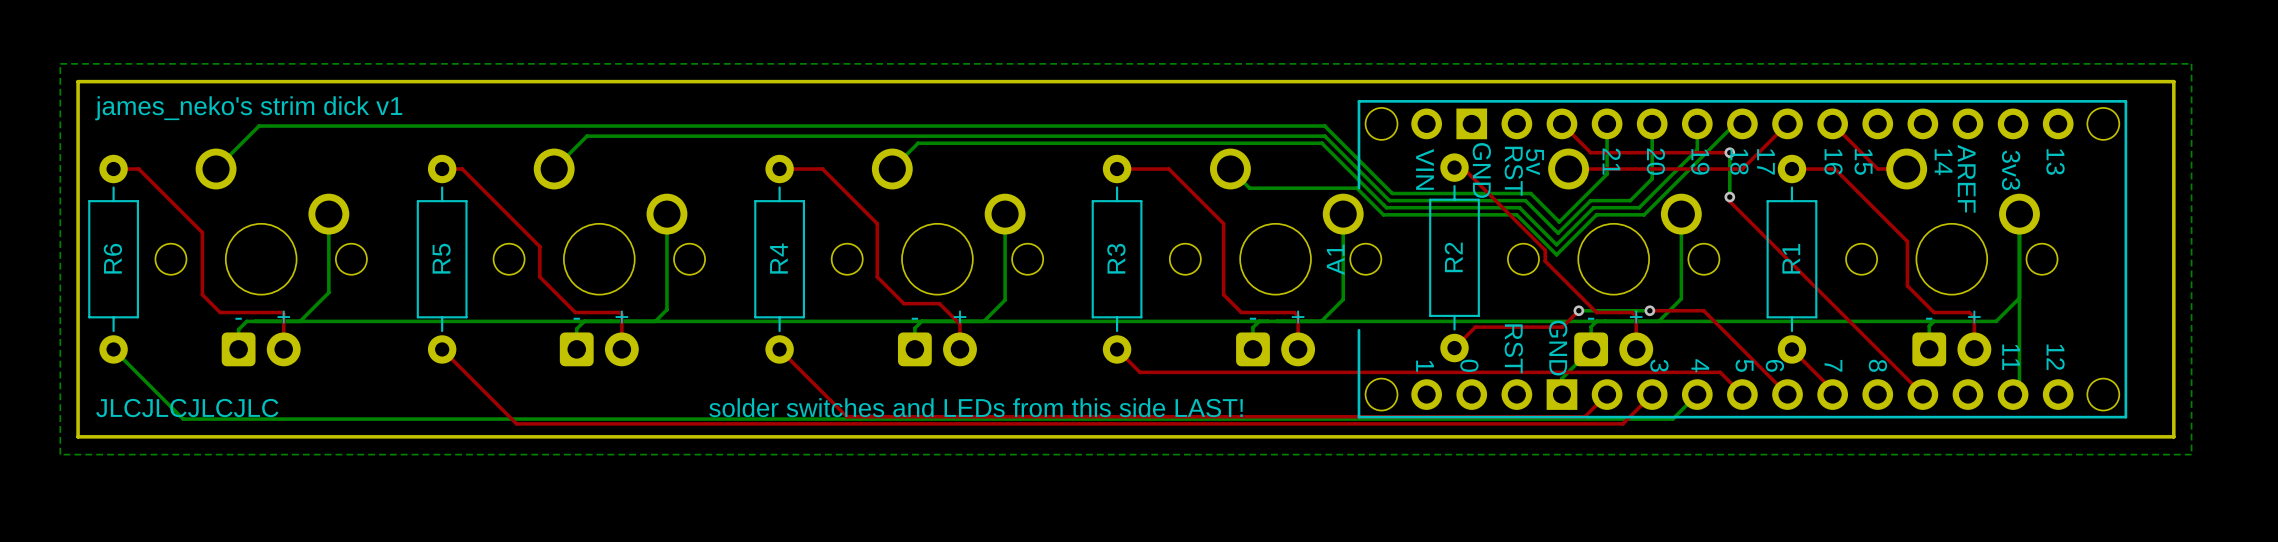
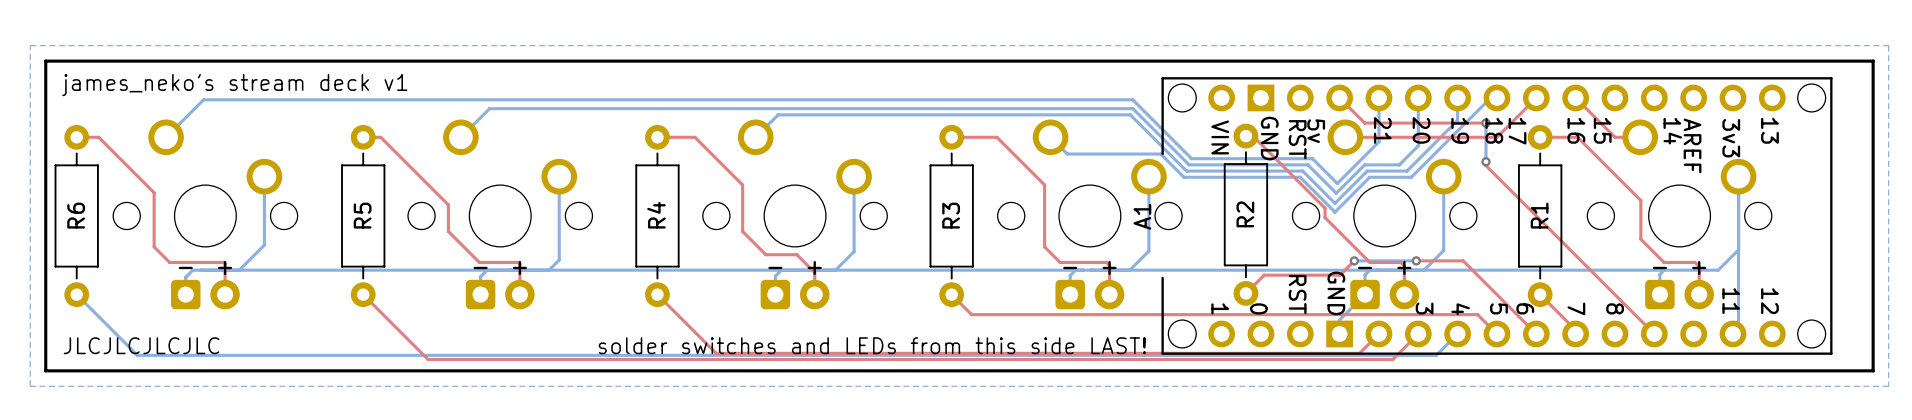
text: james_neko's strim dick v1 (248, 108) -> james_neko's stream deck v1 (234, 85)

